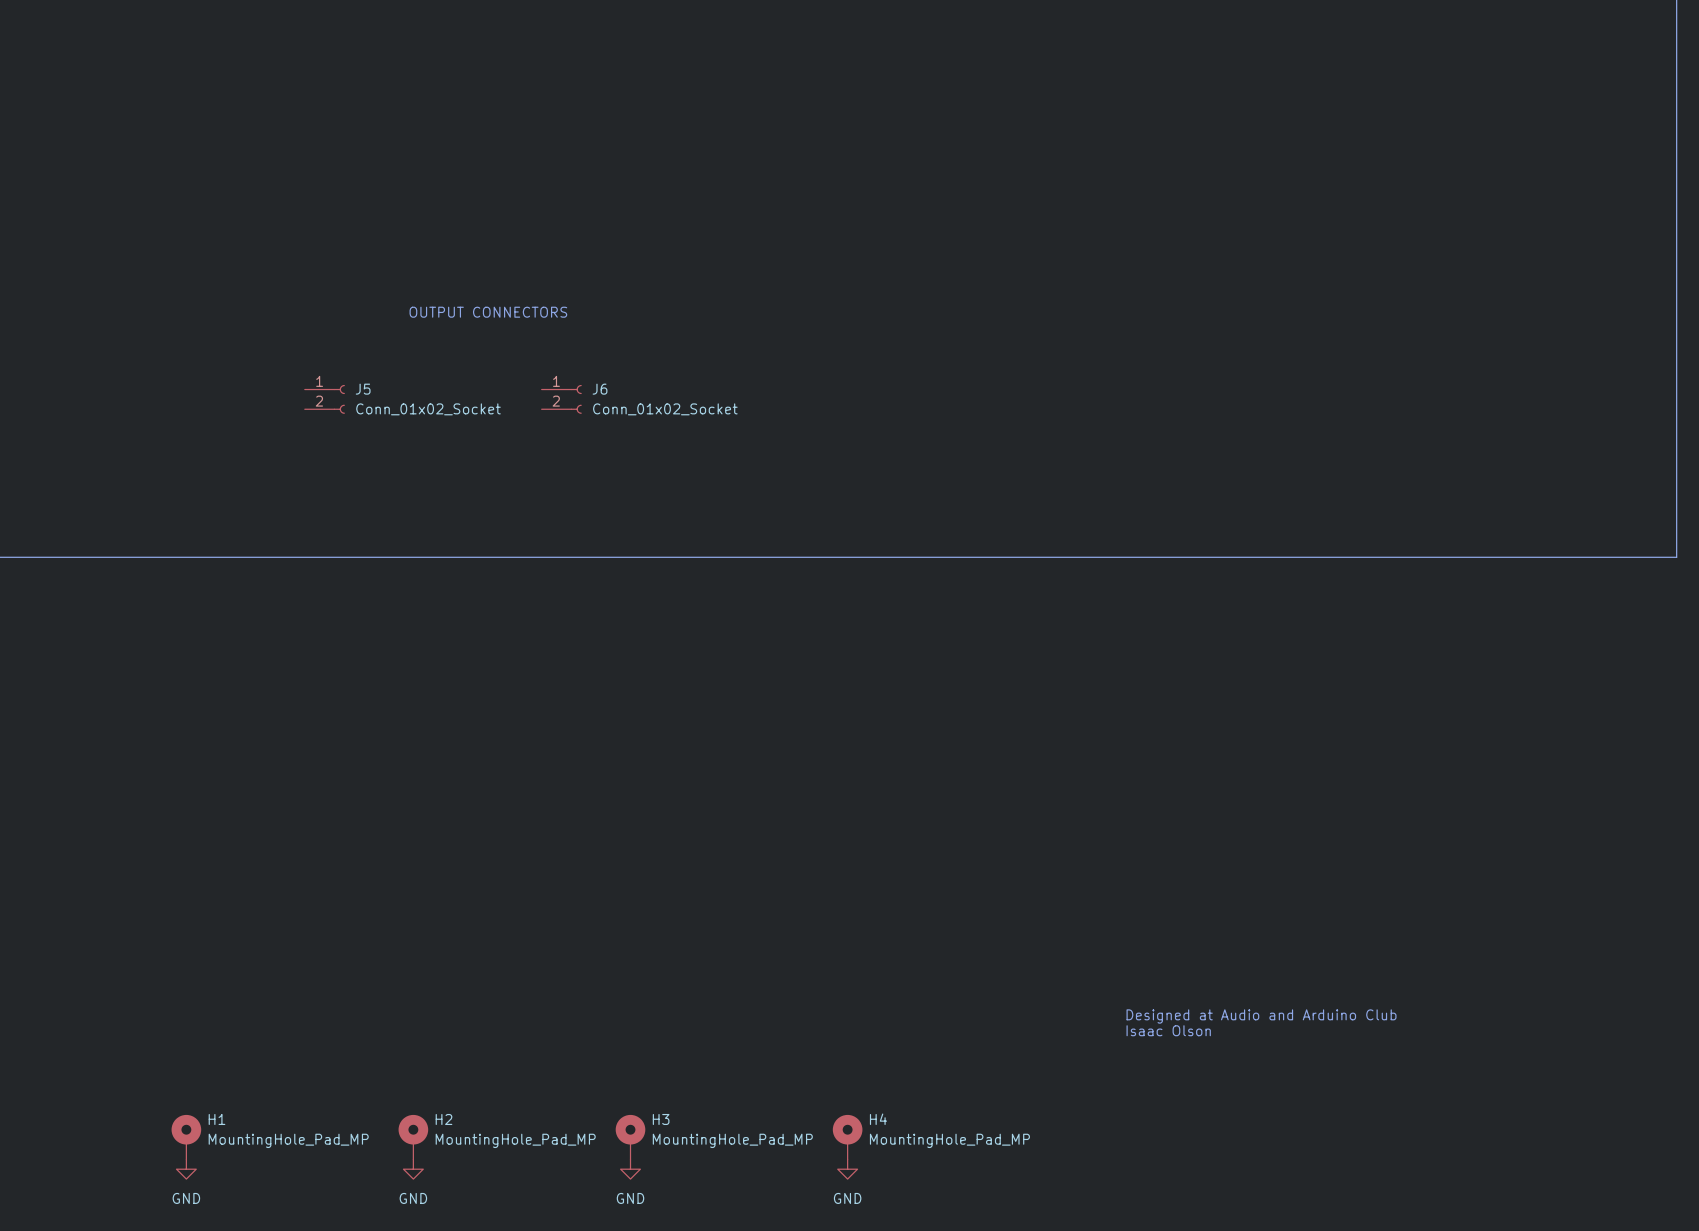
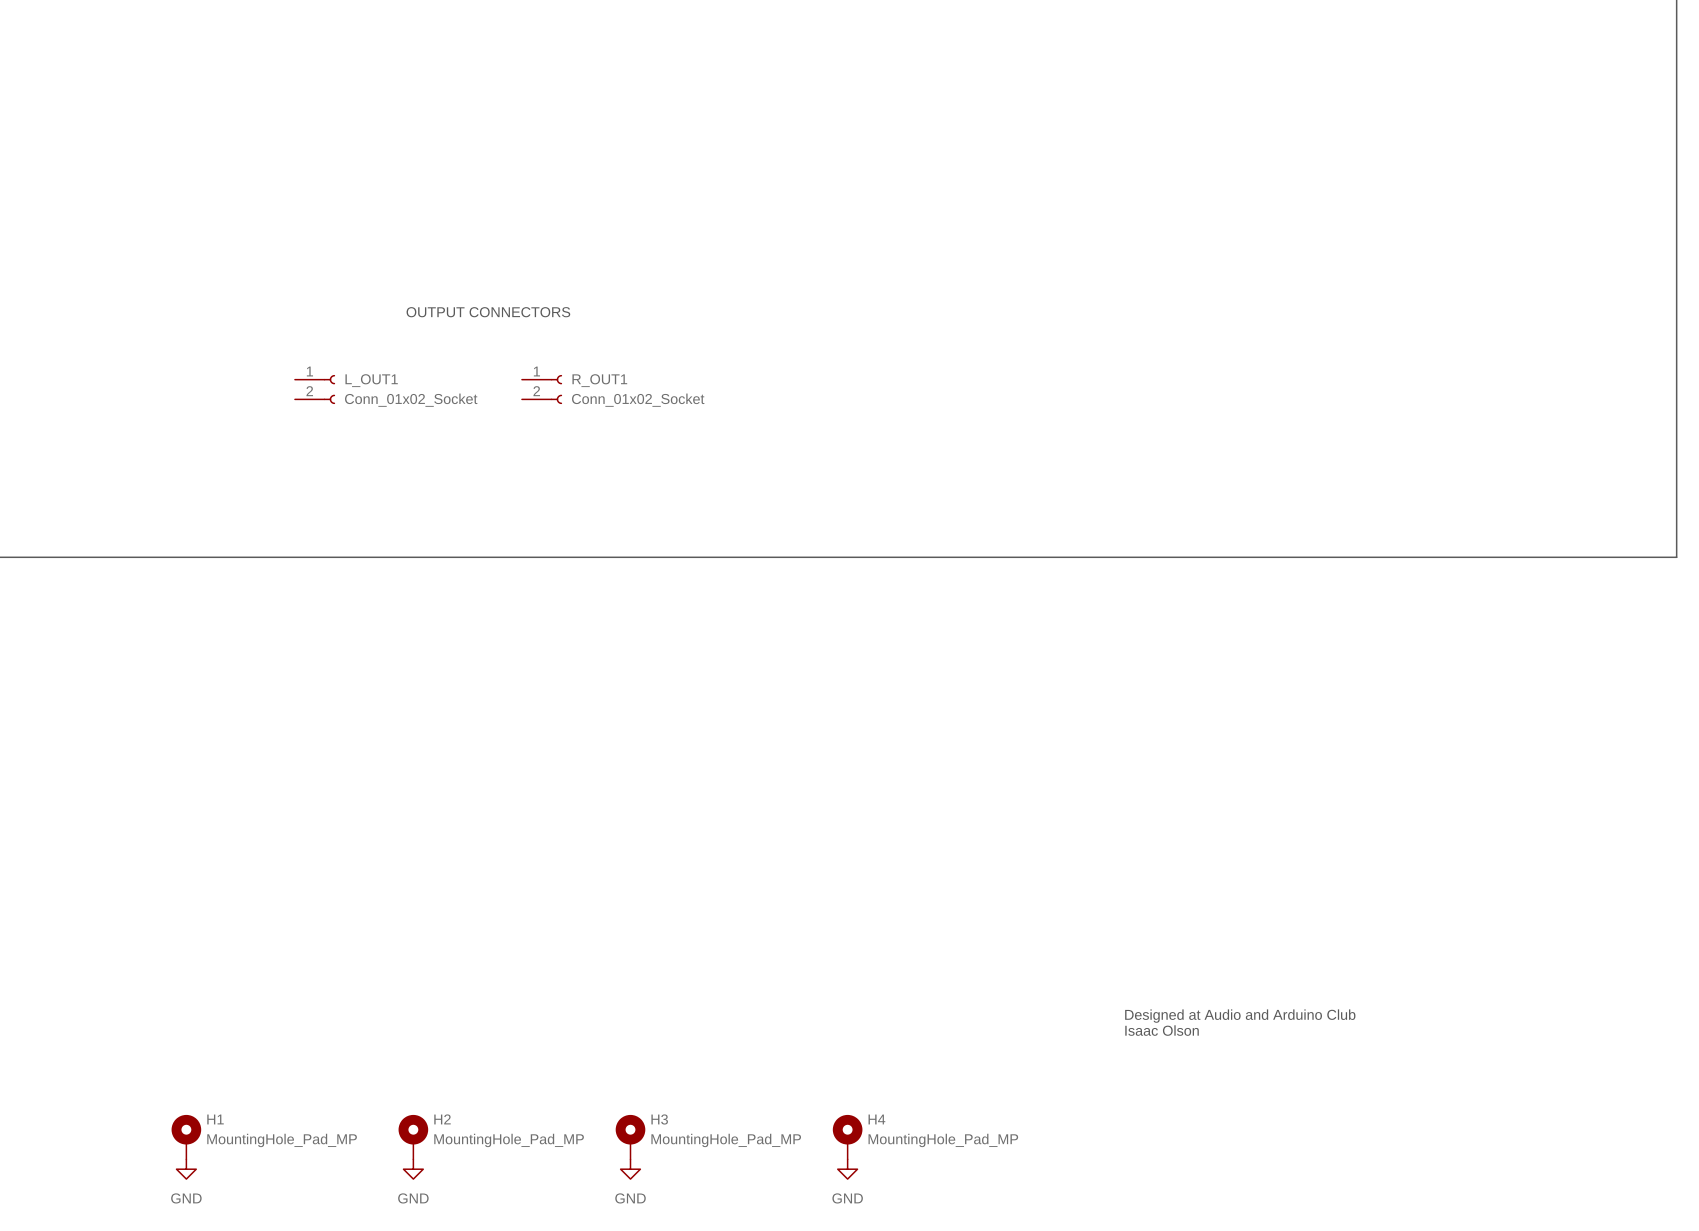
L_OUT1: none -> Conn_01x02_Socket (314, 389)
R_OUT1: none -> Conn_01x02_Socket (541, 389)
J5: Conn_01x02_Socket (324, 399) -> none
J6: Conn_01x02_Socket (561, 399) -> none

